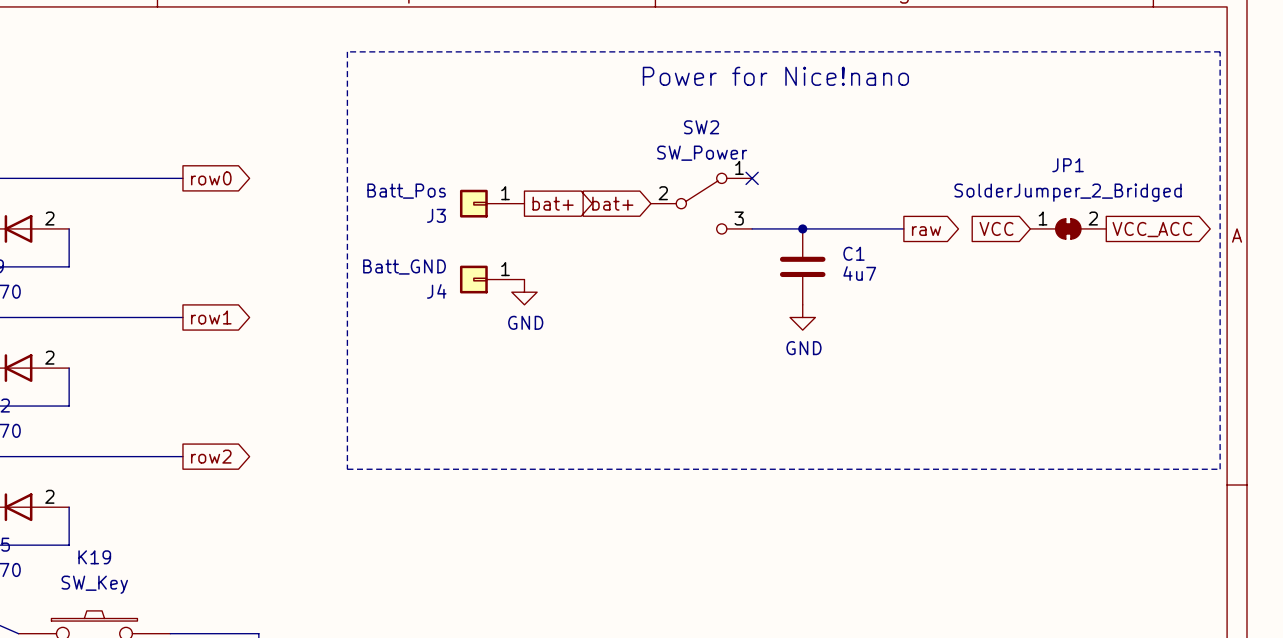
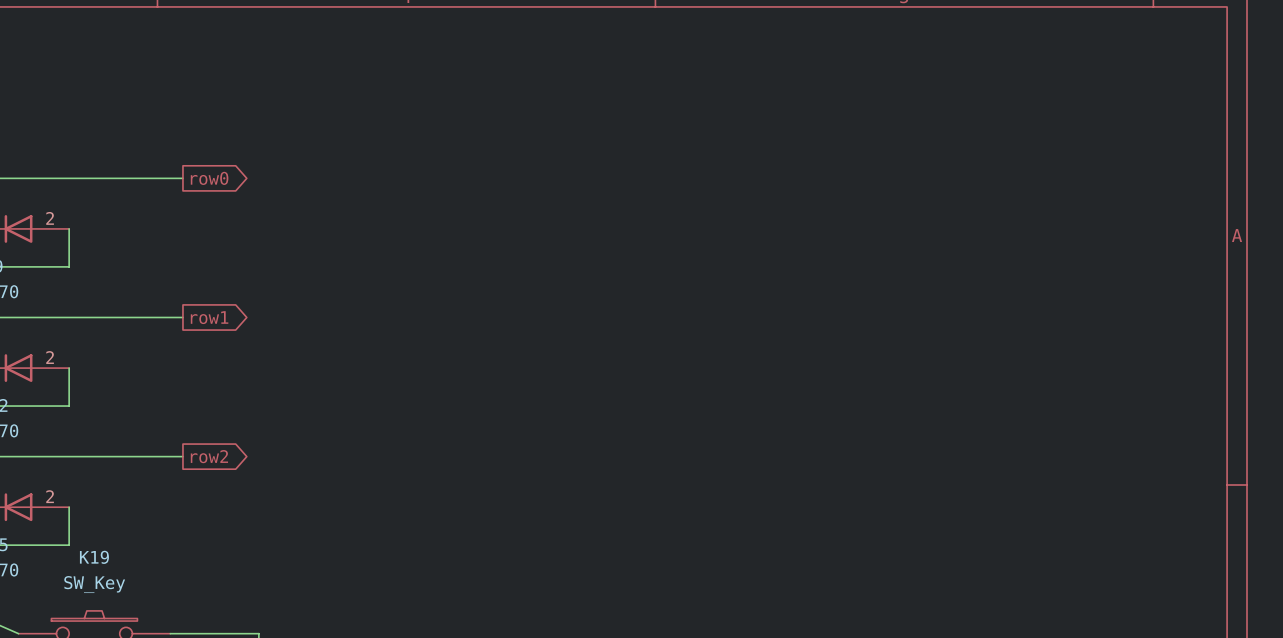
line: (347, 51) (1220, 51) (1220, 469) (347, 469) (347, 51) -> none
text: Power for Nice!nano (775, 76) -> none
no-connect mark: (752, 178) -> none
J3: Batt_Pos (492, 203) -> none
global label: bat+ (553, 203) -> none
global label: bat+ (612, 203) -> none
SW2: SW_Power (701, 203) -> none
wire: (752, 228) (903, 228) -> none
junction: (802, 228) -> none
global label: VCC (996, 228) -> none
JP1: SolderJumper_2_Bridged (1068, 228) -> none
global label: VCC_ACC (1152, 229) -> none
global label: raw (926, 231) -> none
C1: 4u7 (802, 266) -> none
J4: Batt_GND (492, 279) -> none
power symbol: GND (524, 292) -> none
power symbol: GND (802, 317) -> none

